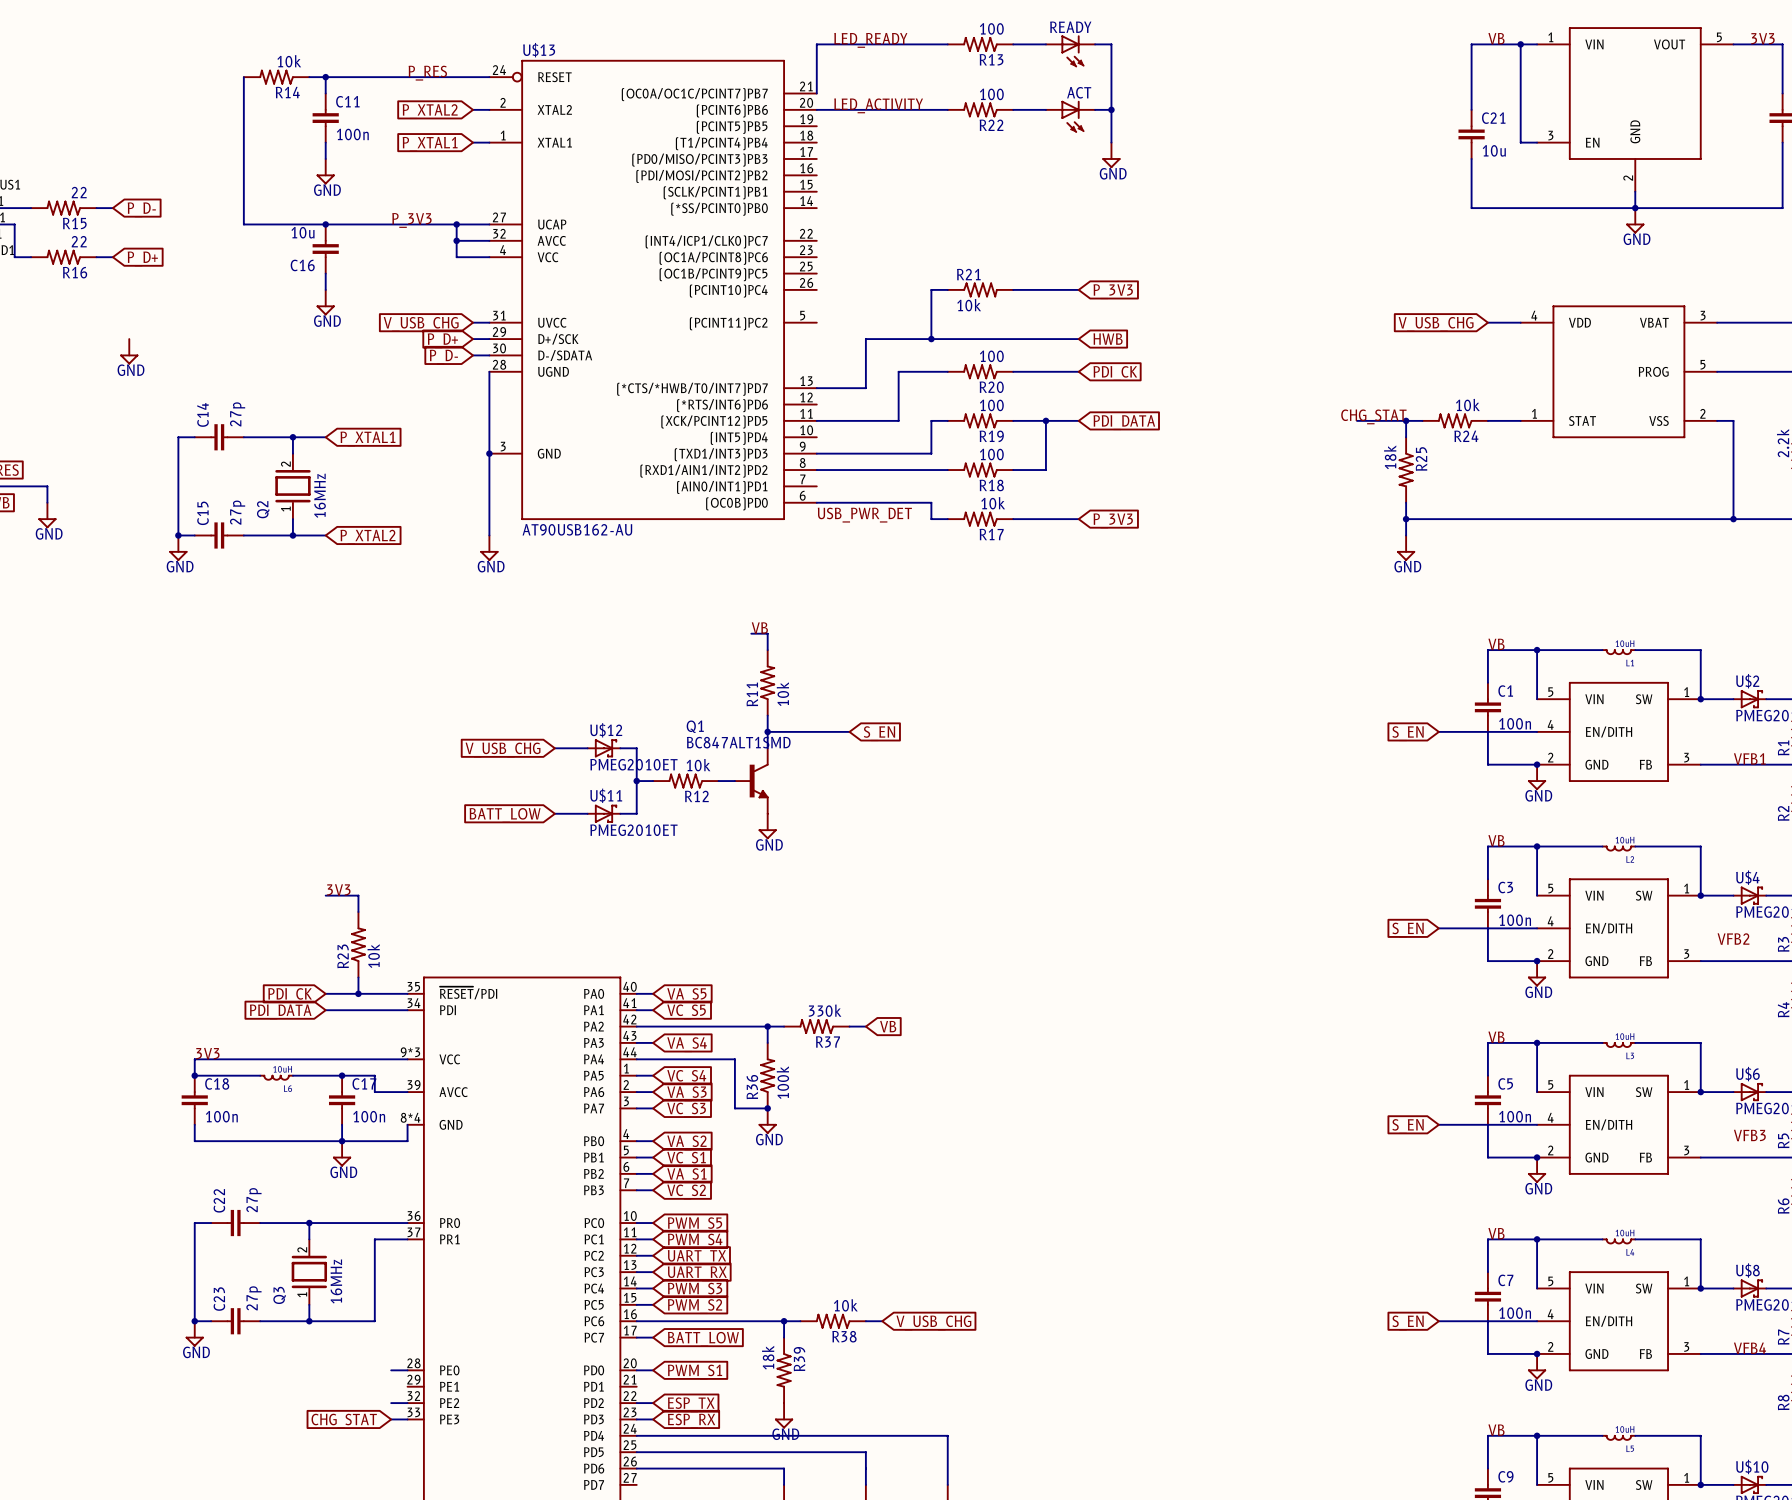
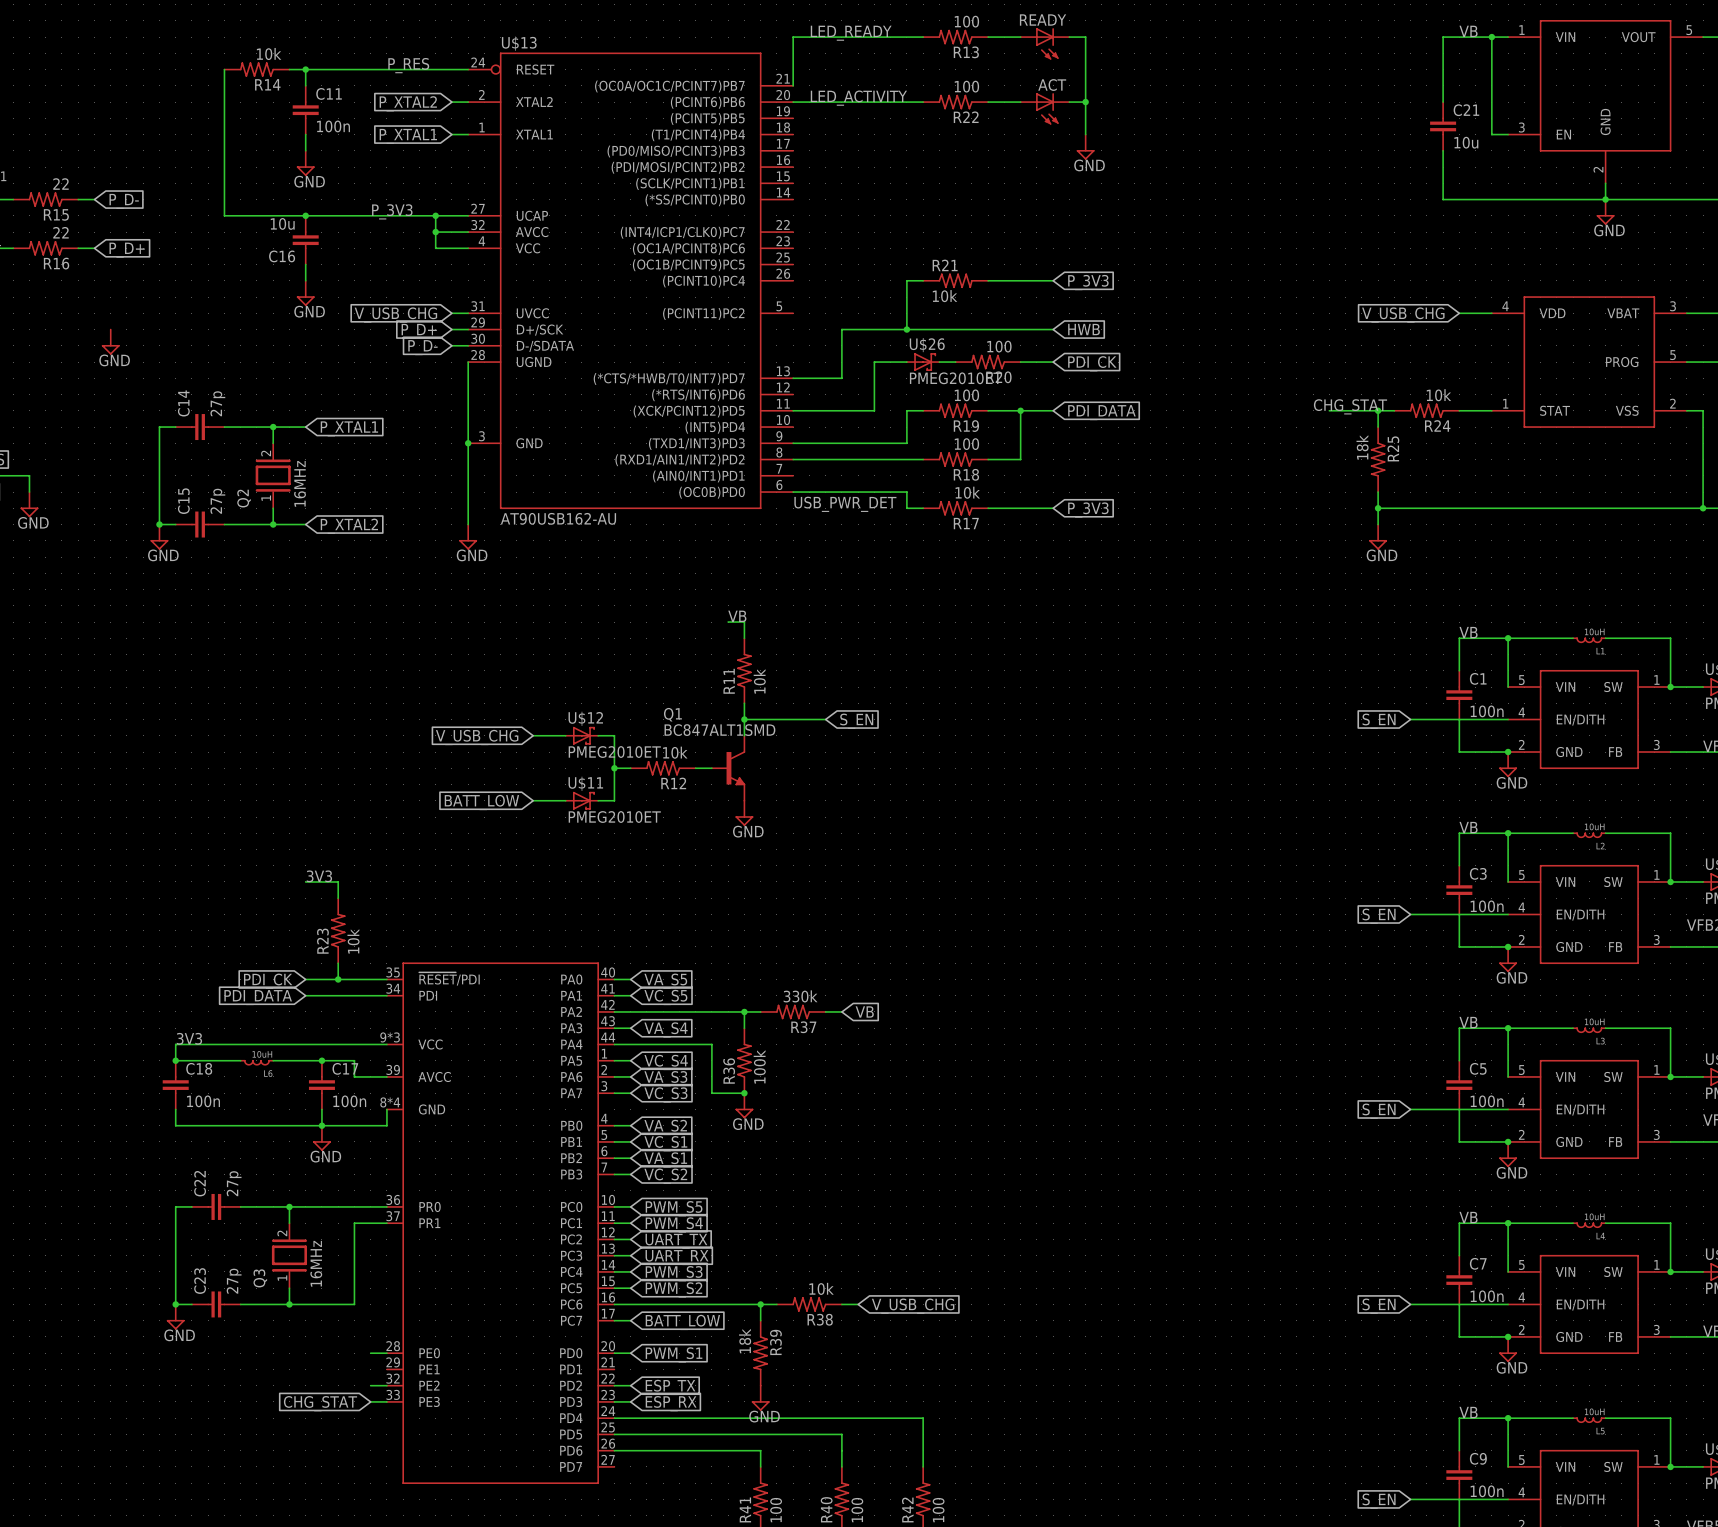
U$26: none -> PMEG2010ET (923, 362)
R20 position: (980, 371) -> (988, 362)

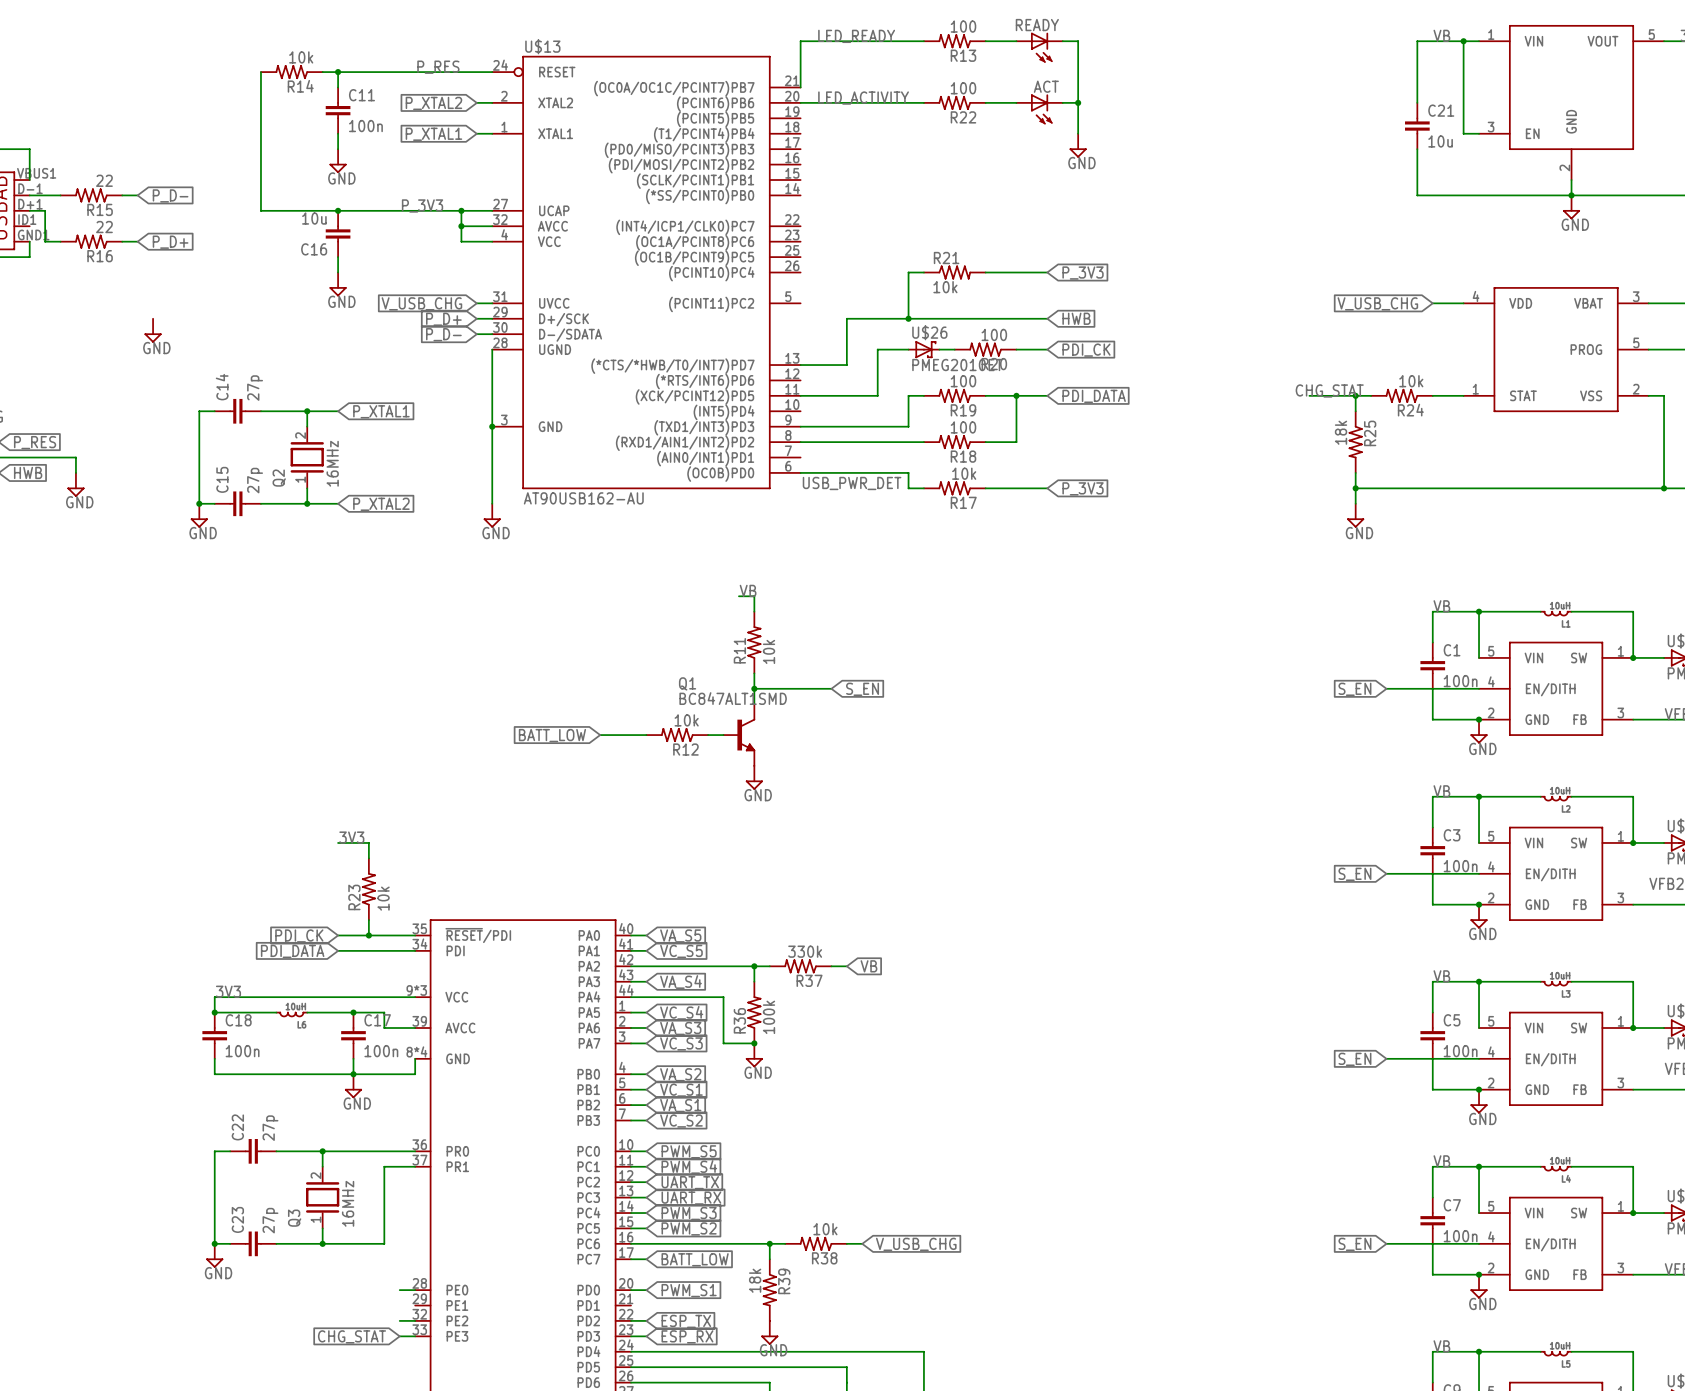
wire: (533, 735) (565, 735) -> (600, 735) (631, 735)
U$12: PMEG2010ET (581, 735) -> none
wire: (598, 735) (614, 735) (614, 800) (598, 800) -> none
global label: V_USB_CHG (477, 737) -> none
junction: (614, 768) -> none
wire: (533, 800) (565, 800) -> none
U$11: PMEG2010ET (581, 800) -> none
global label position: BATT_LOW (481, 802) -> BATT_LOW (552, 735)

